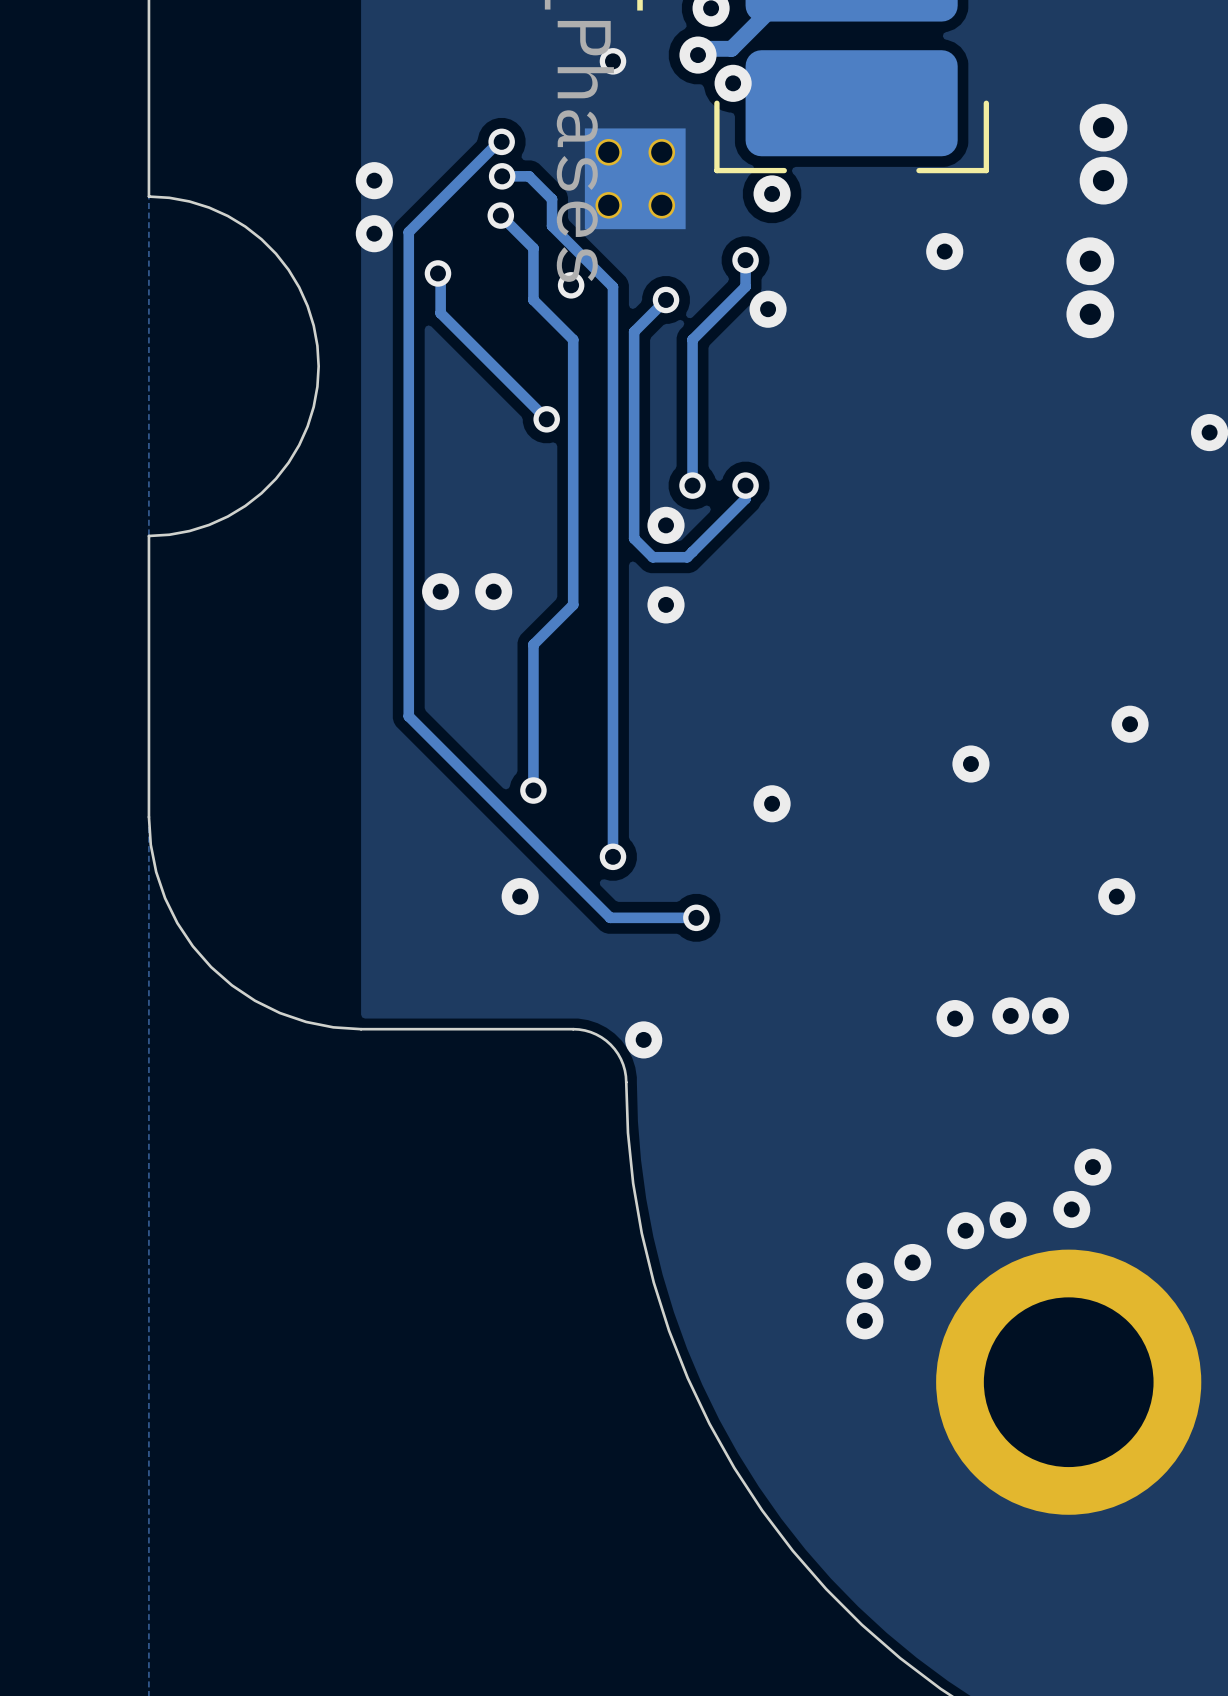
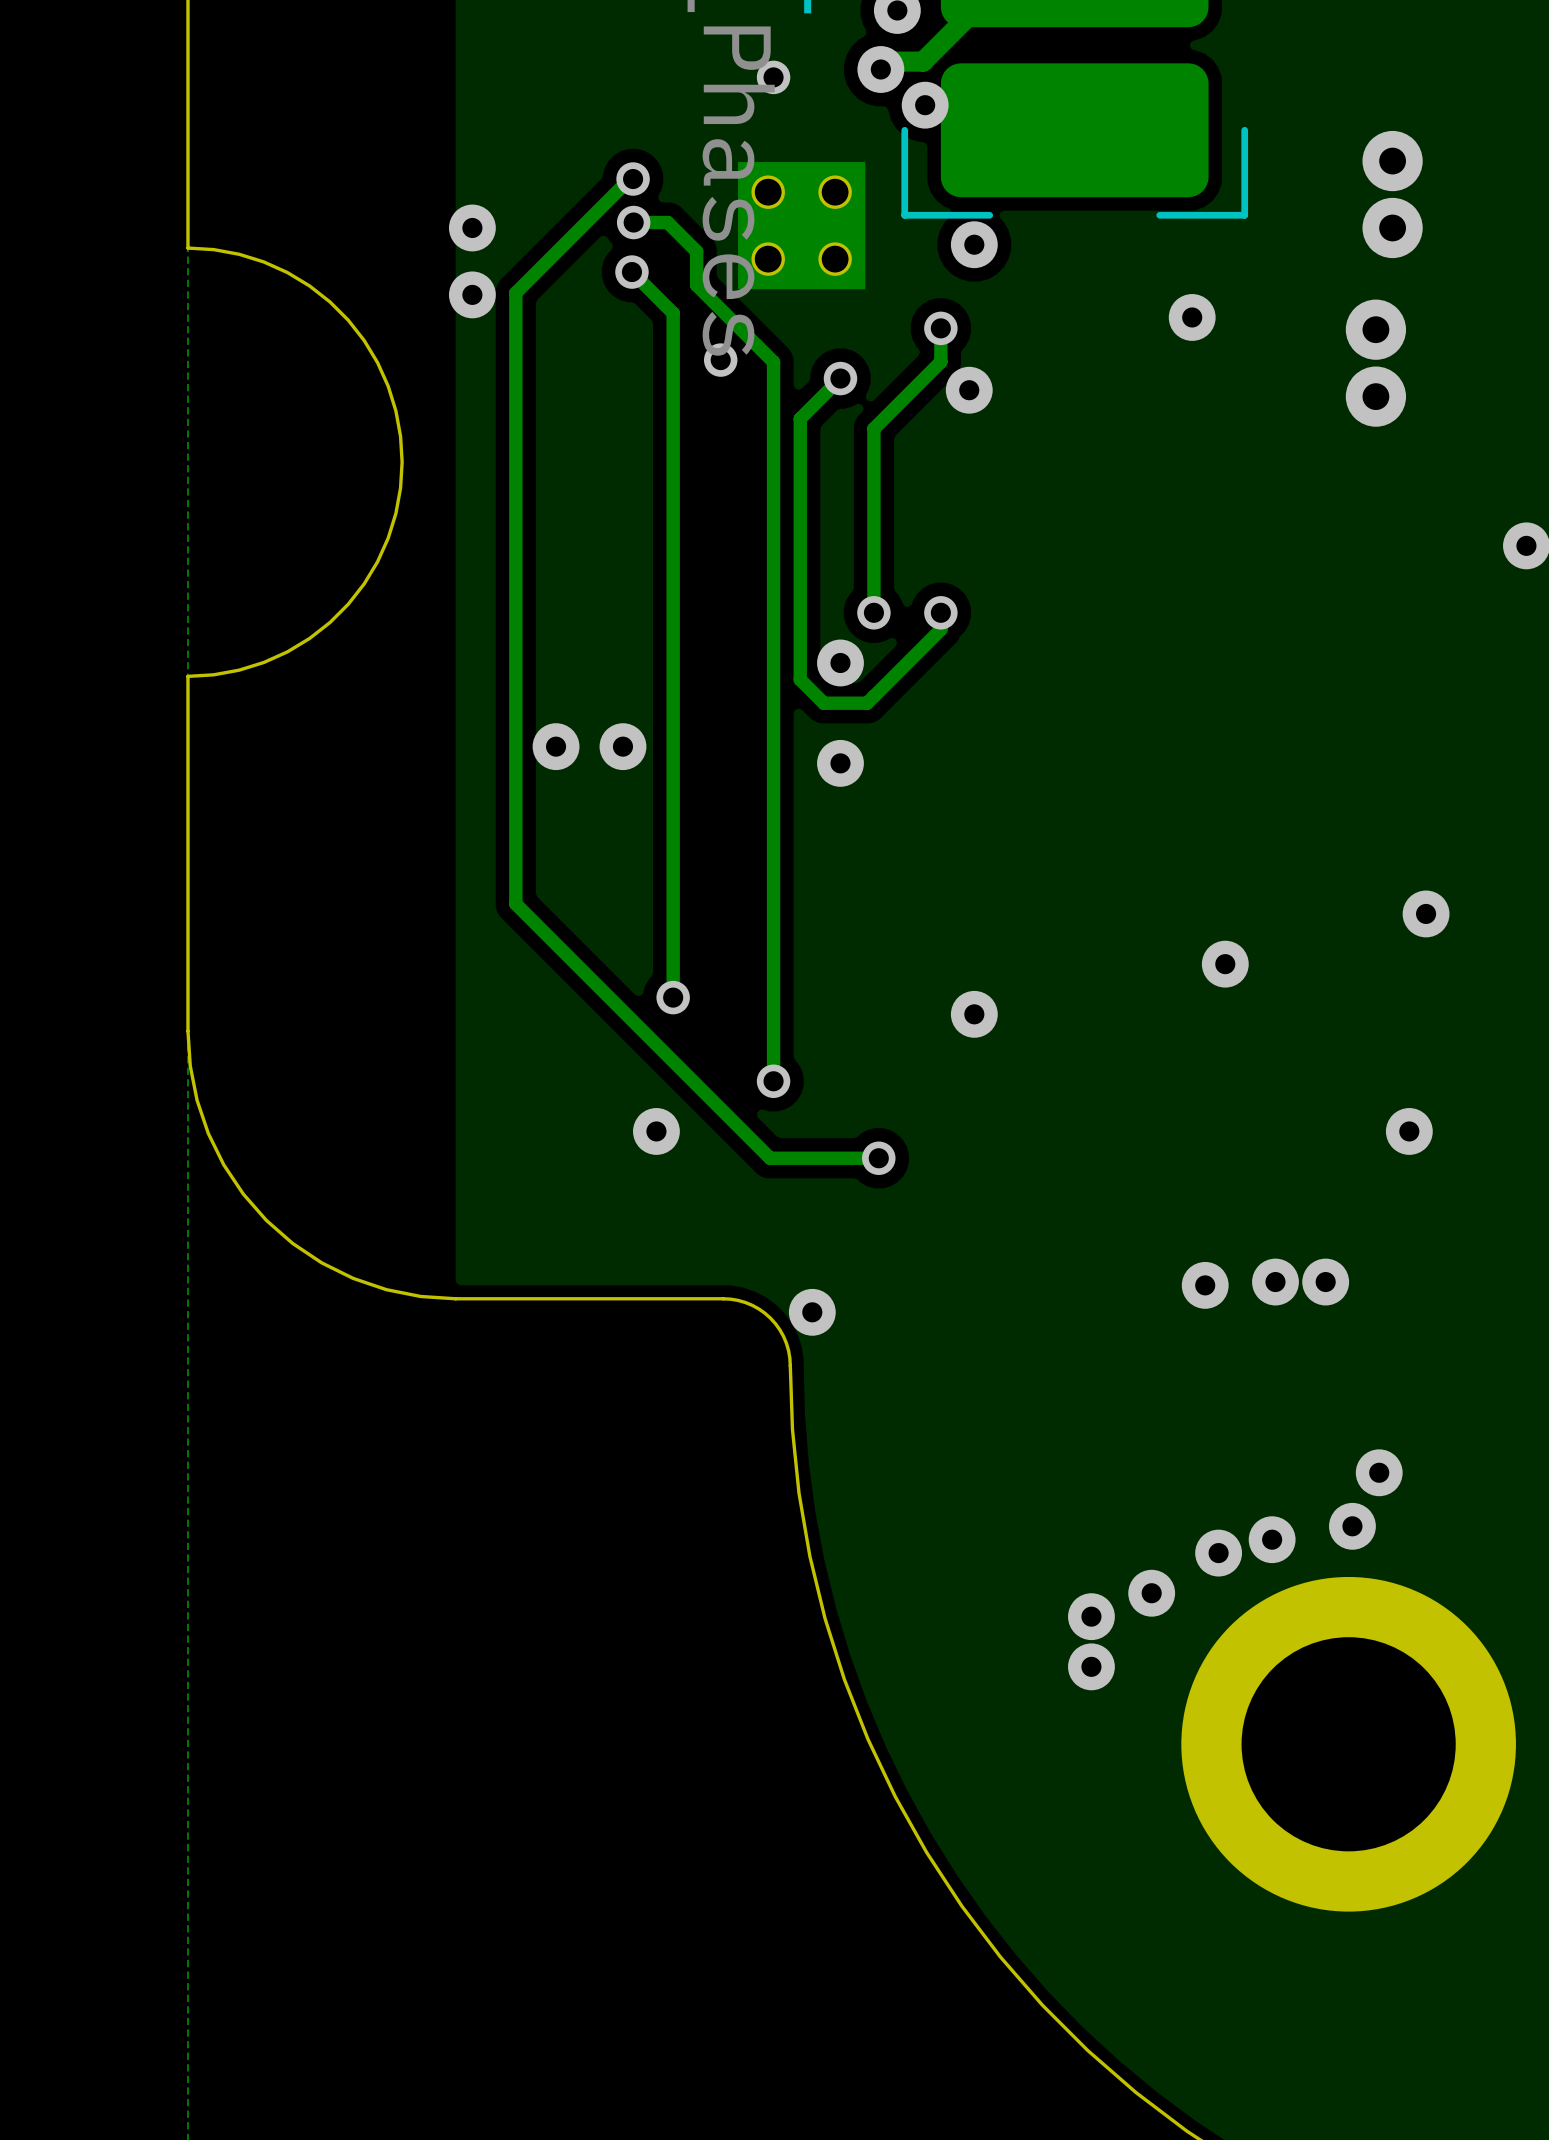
track: (437, 273) (440, 273) (440, 313) (546, 419) -> none
via: (437, 273) -> none
track: (533, 299) (573, 339) (573, 604) (533, 644) -> (673, 378) (673, 813)
via: (546, 419) -> none

